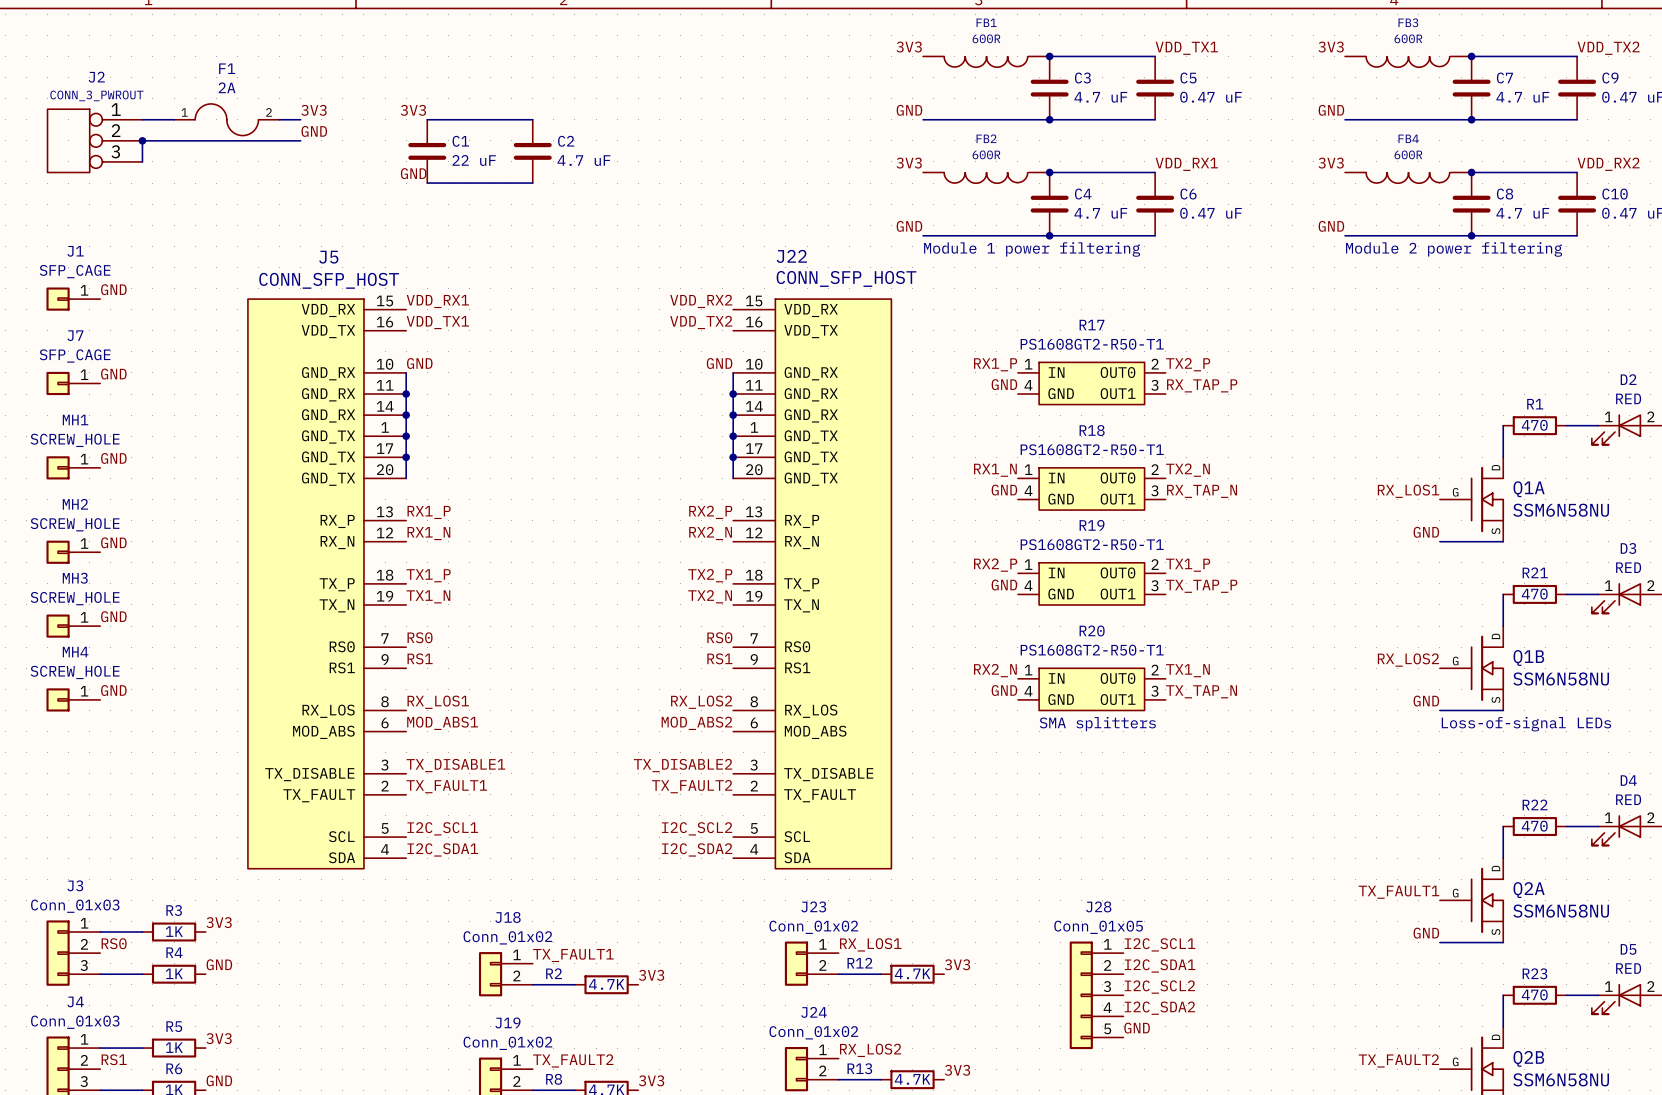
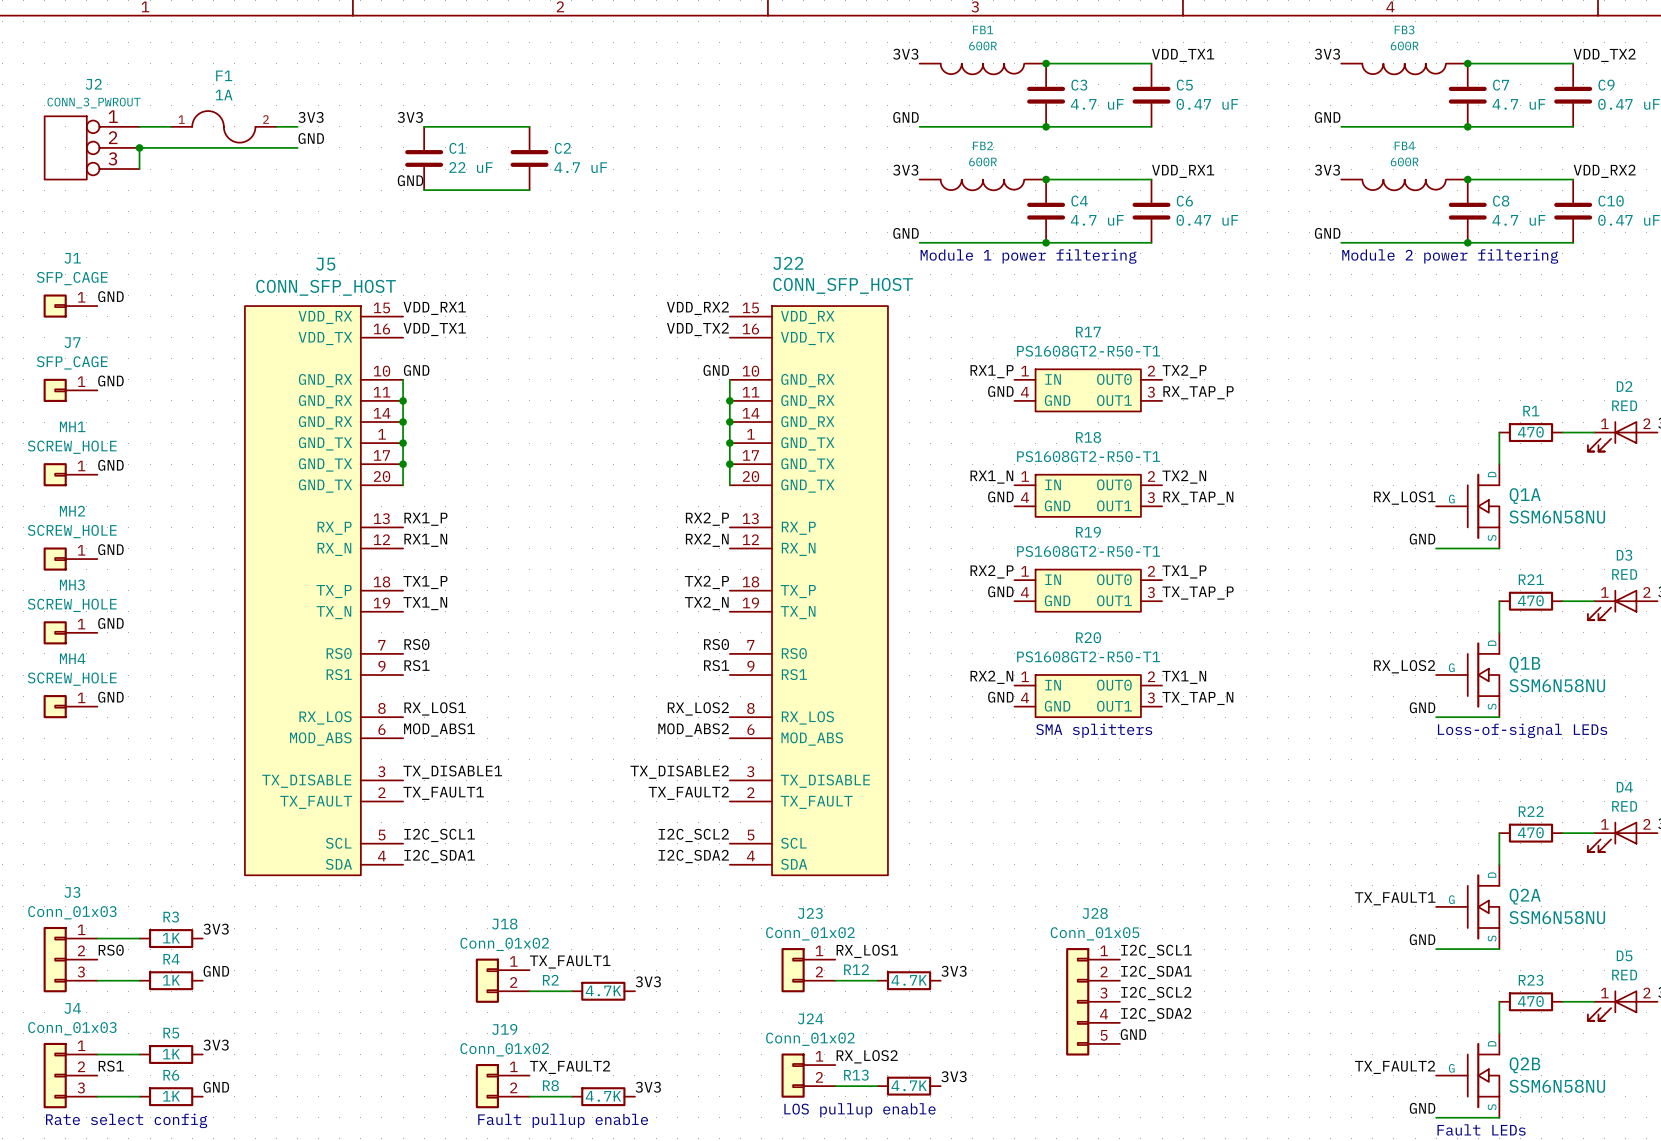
F1 value: 2A (227, 87) -> 1A (224, 95)

